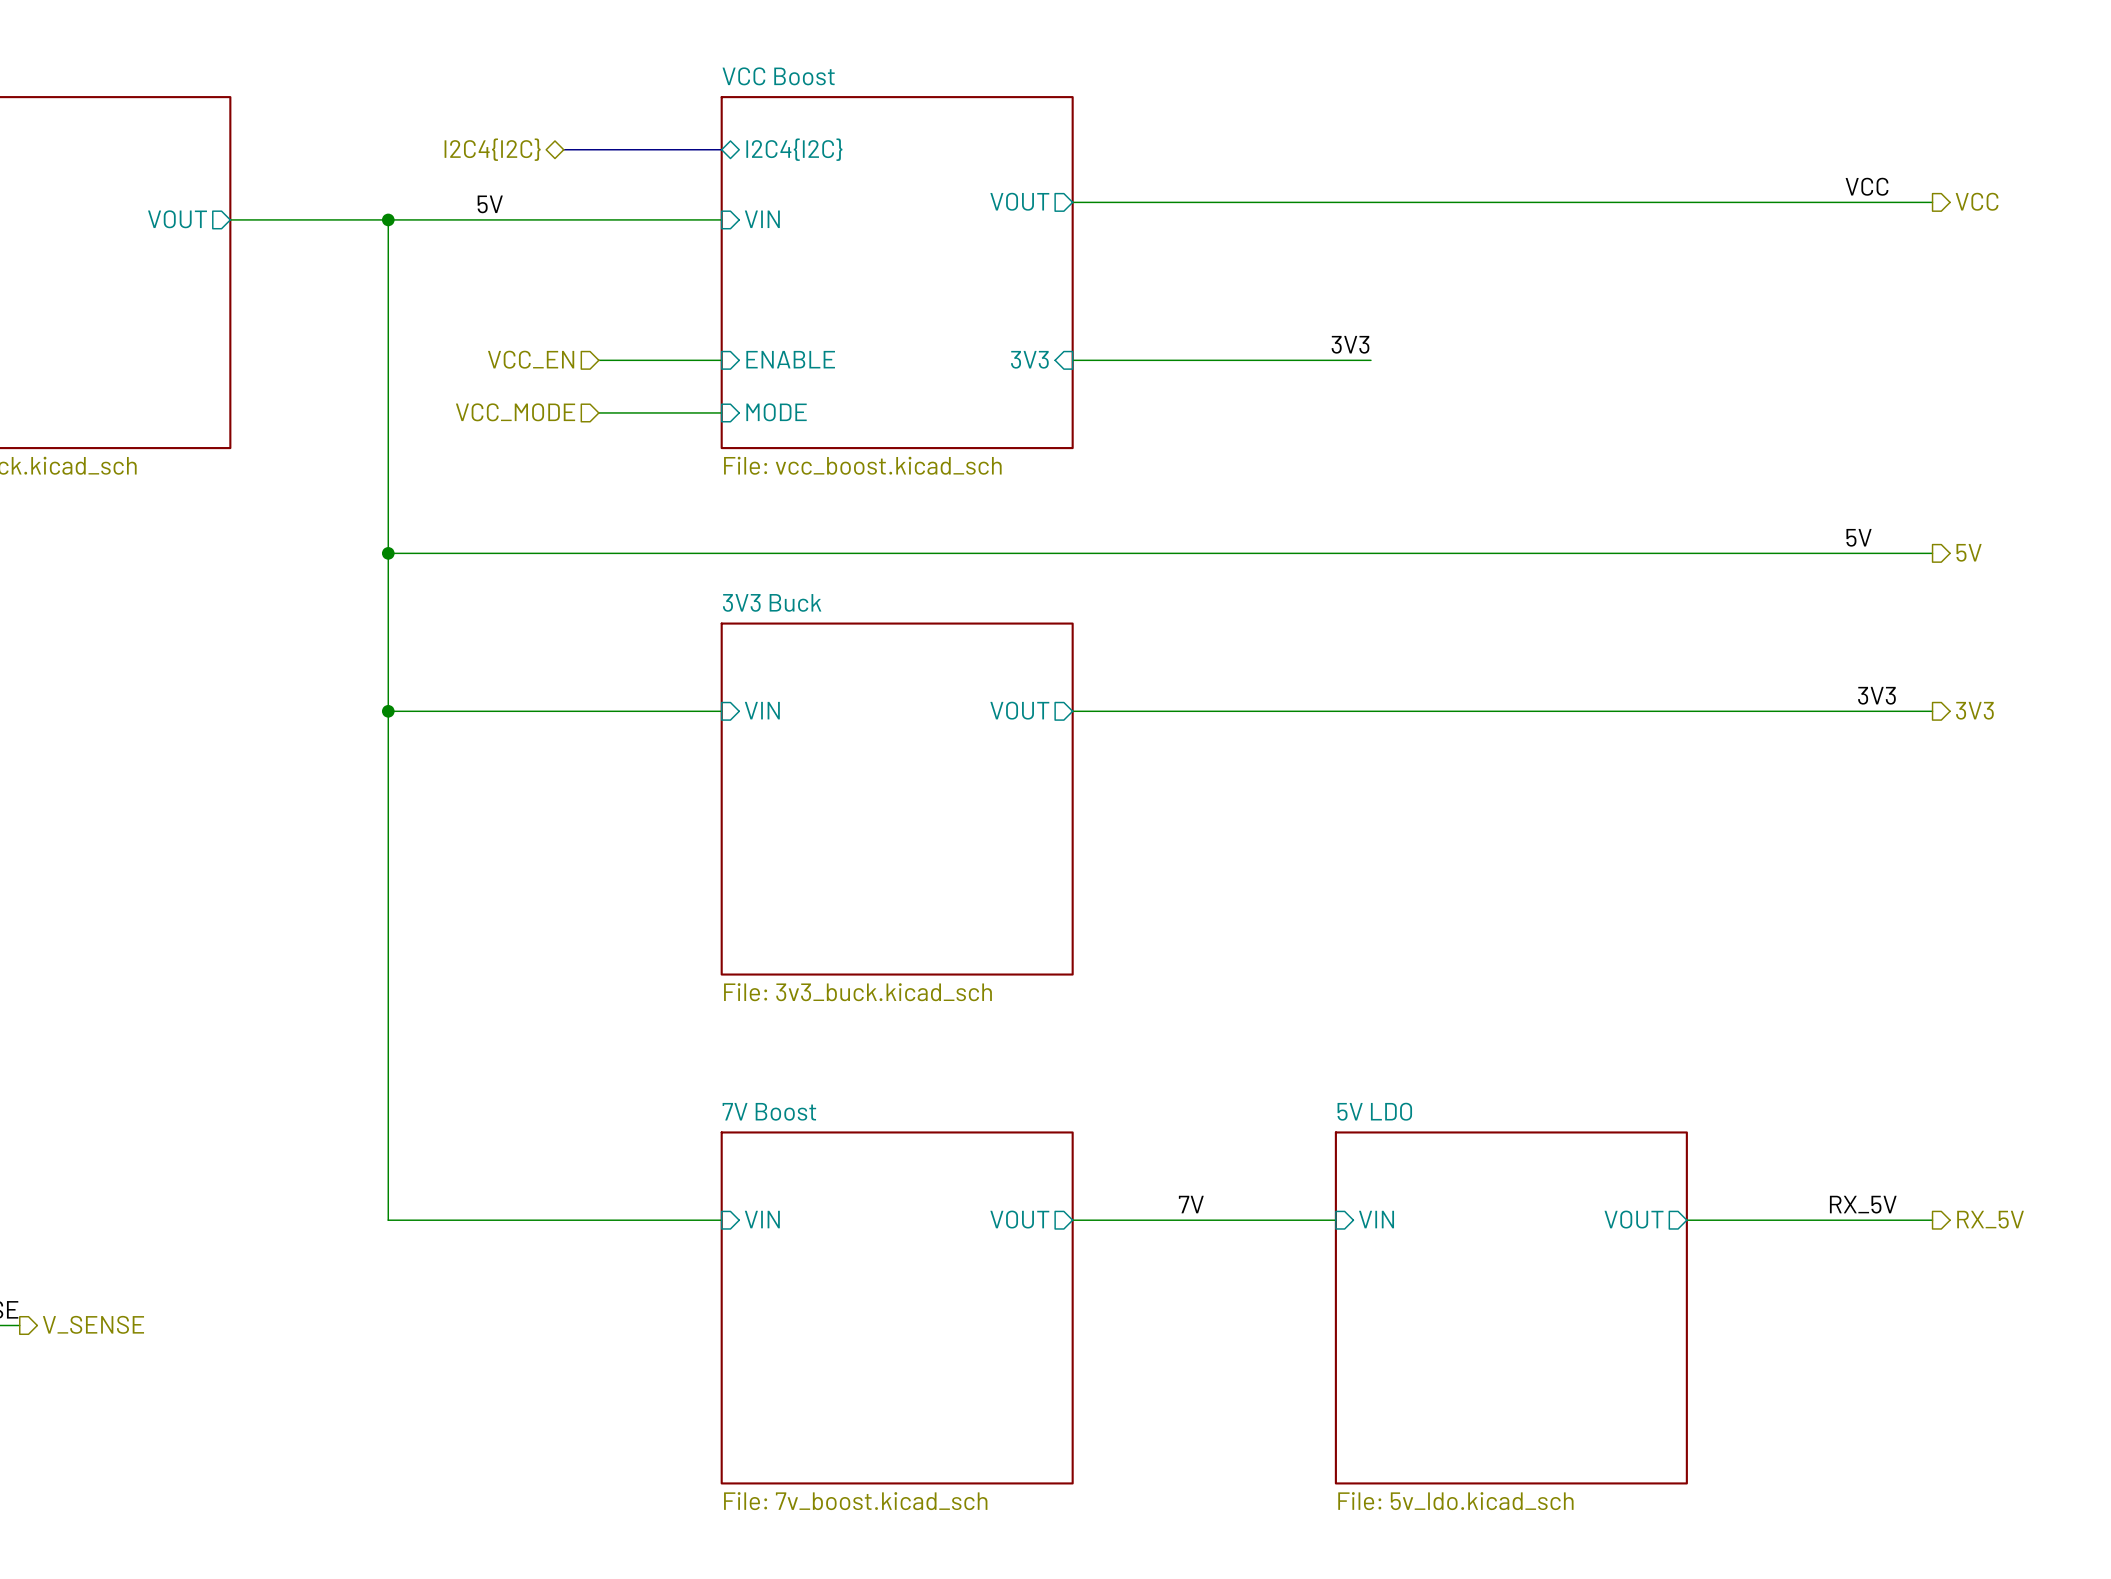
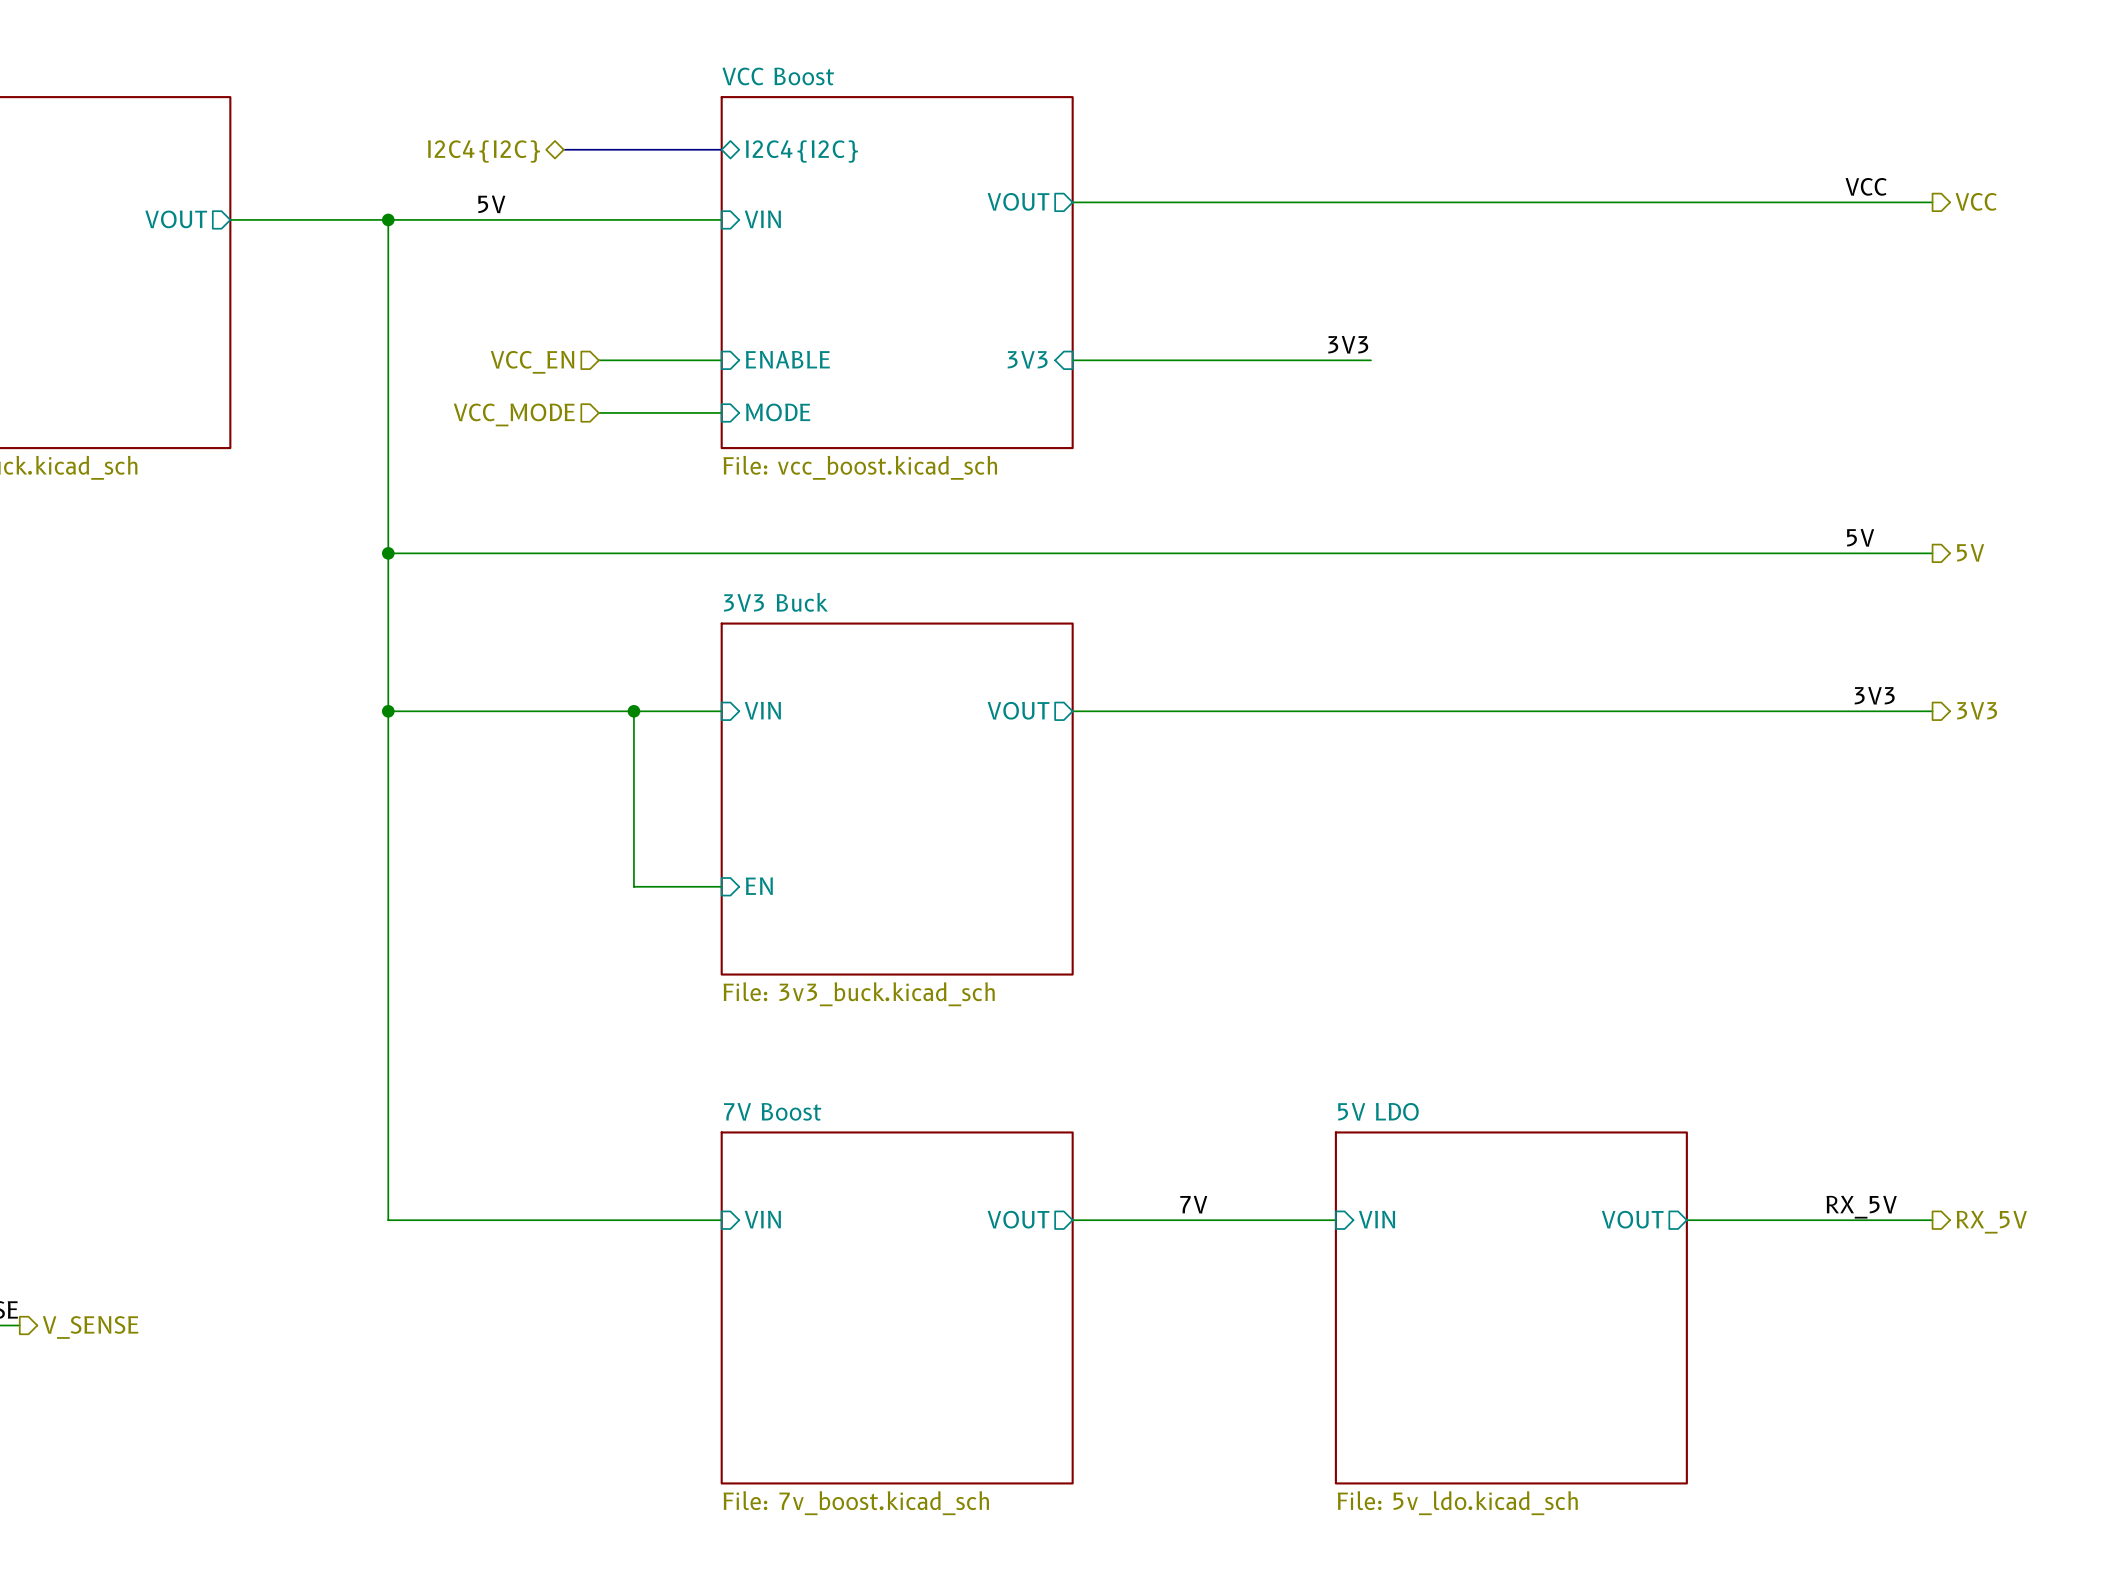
wire: none -> (633, 711) (633, 886) (721, 886)
junction: none -> (633, 711)
sheet pin: none -> EN (759, 886)

